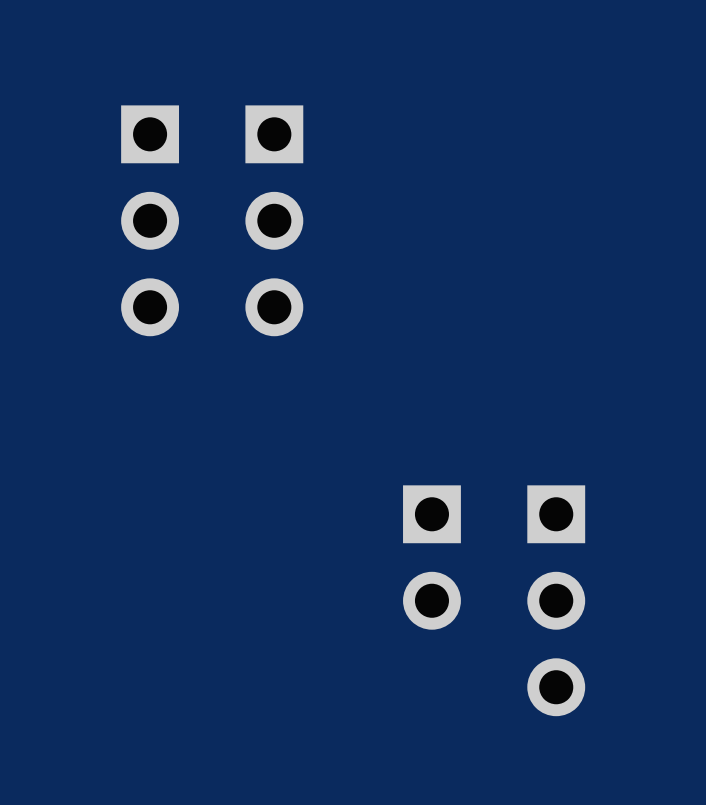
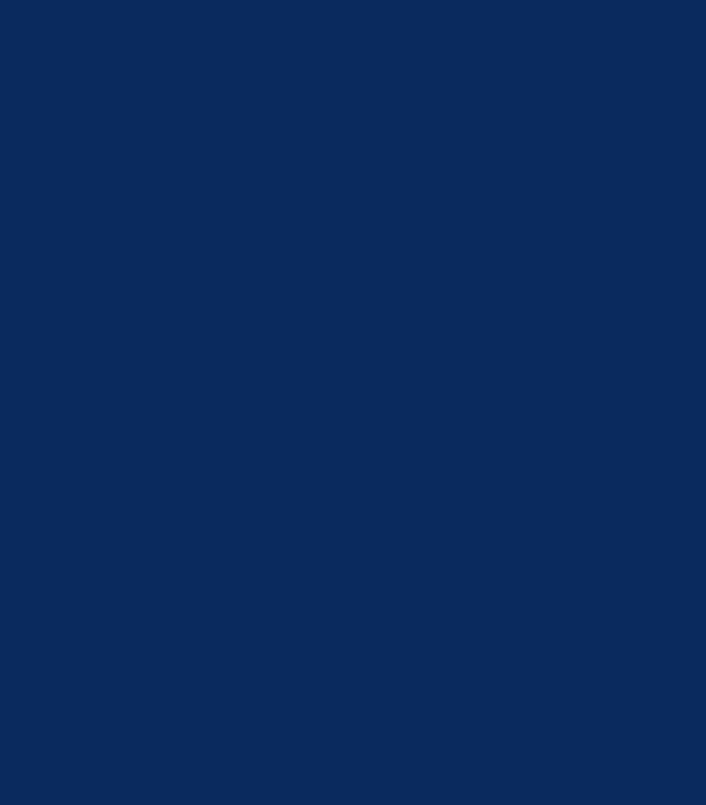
part: (150, 220) -> none
part: (274, 220) -> none
part: (431, 557) -> none
part: (556, 600) -> none

